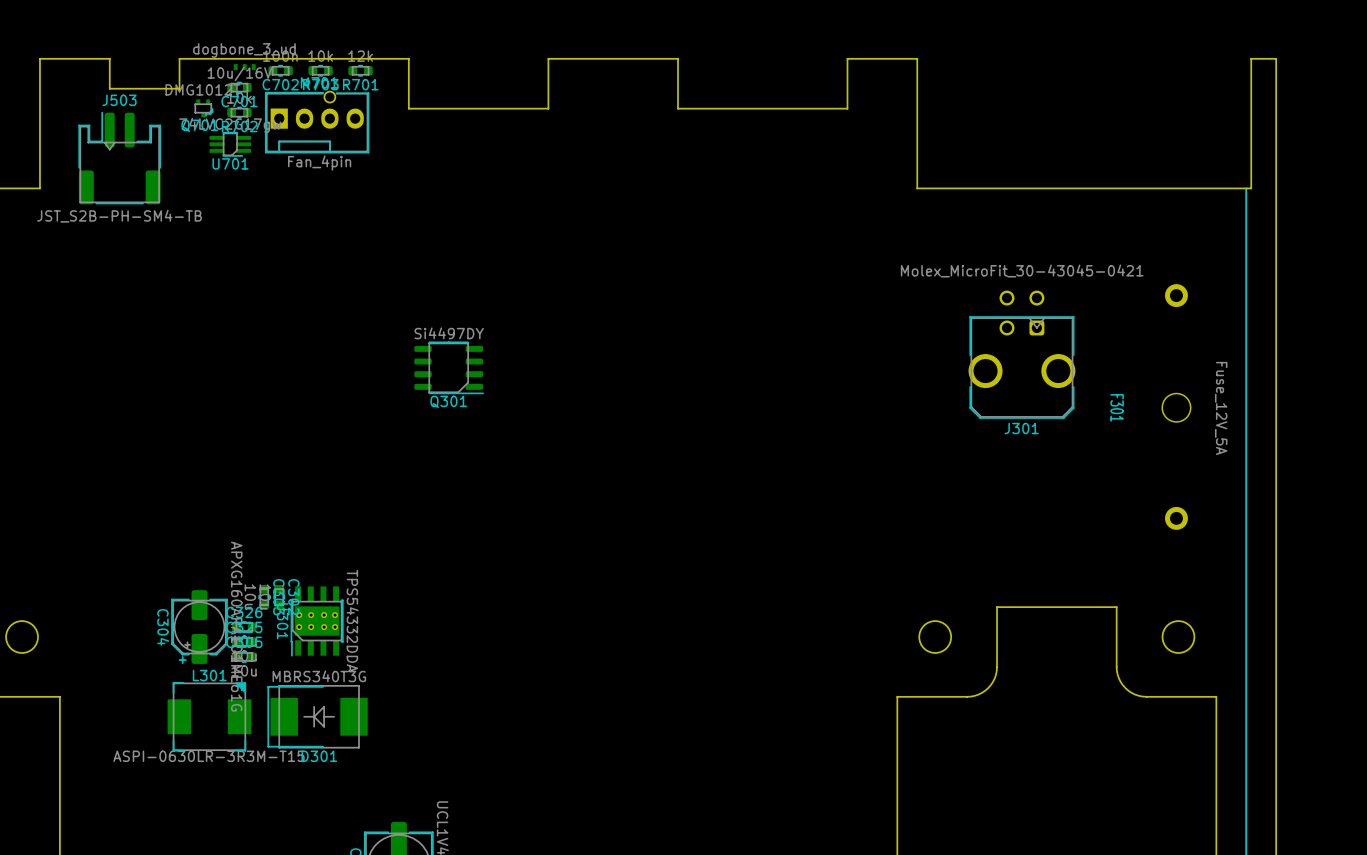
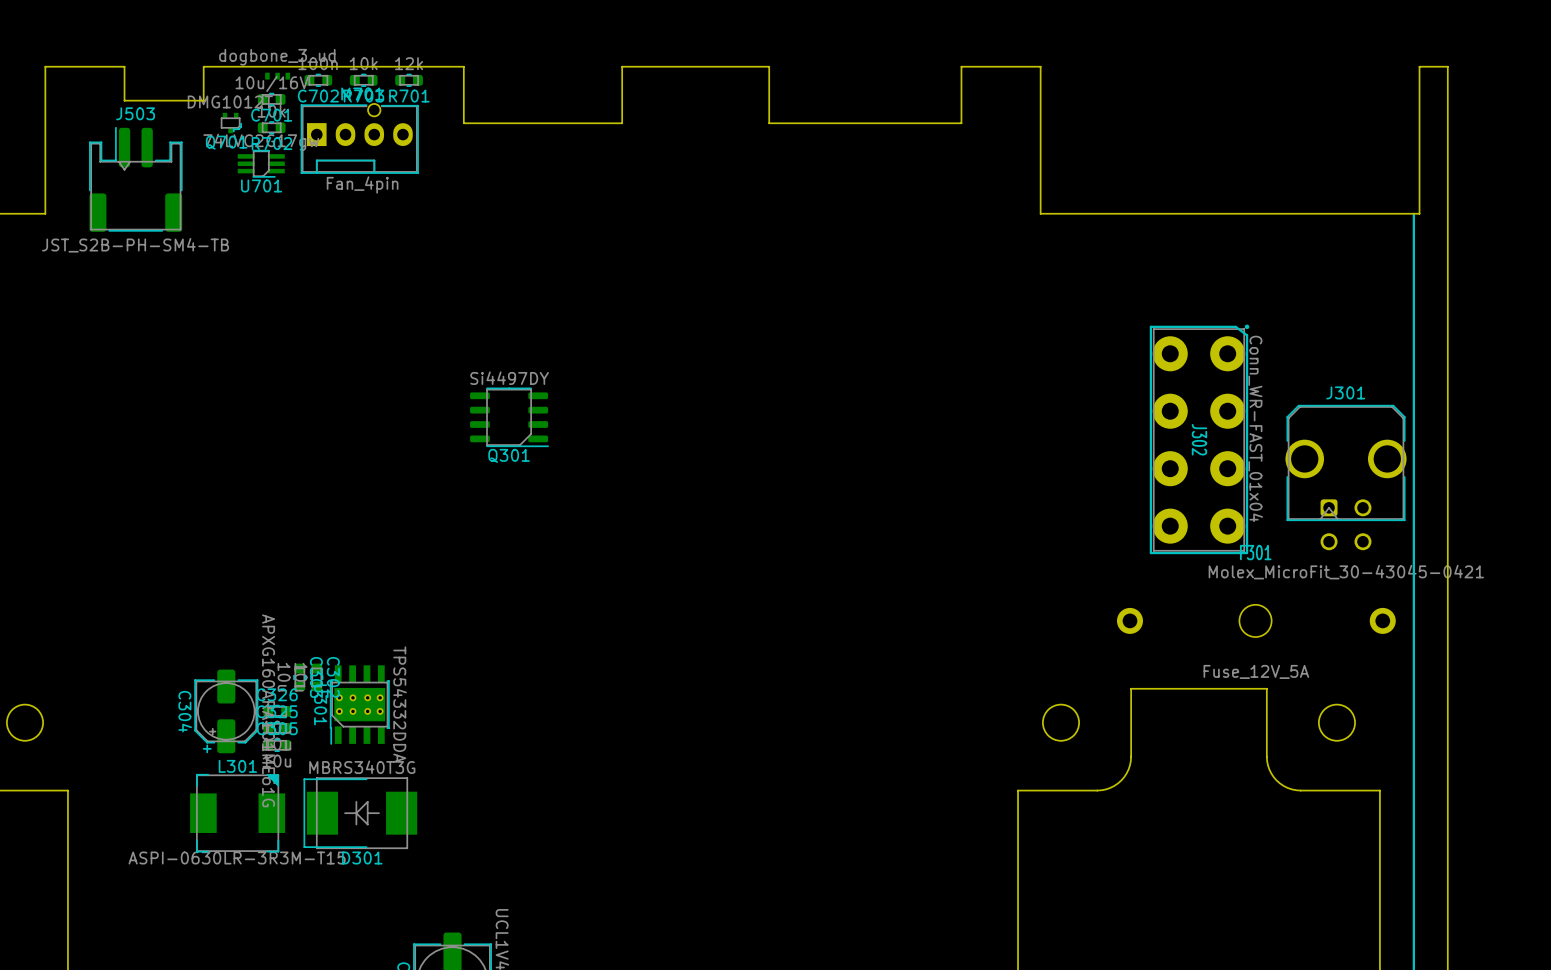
J301 rotation: 0° (1021, 354) -> 180° (1346, 477)
J301 position: (1021, 354) -> (1346, 477)
J302: none -> Conn_WR-FAST_01x04 (1199, 439)
F301 rotation: 0° (1176, 406) -> 90° clockwise (1256, 620)
F301 position: (1176, 406) -> (1256, 620)

